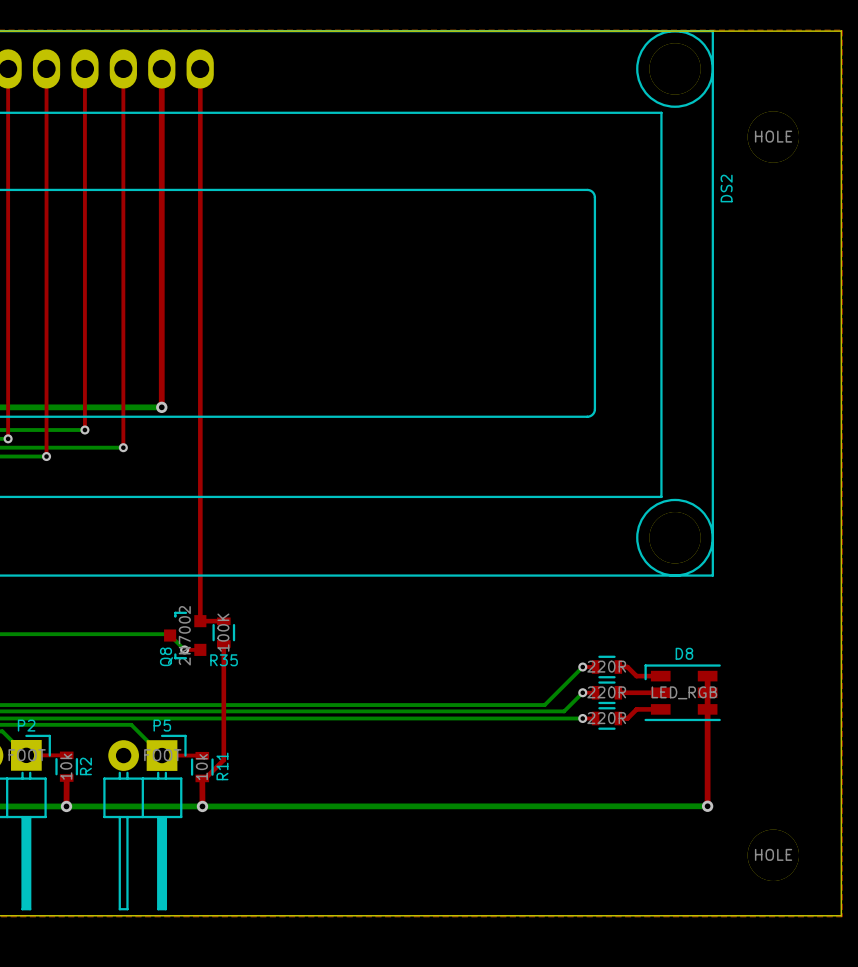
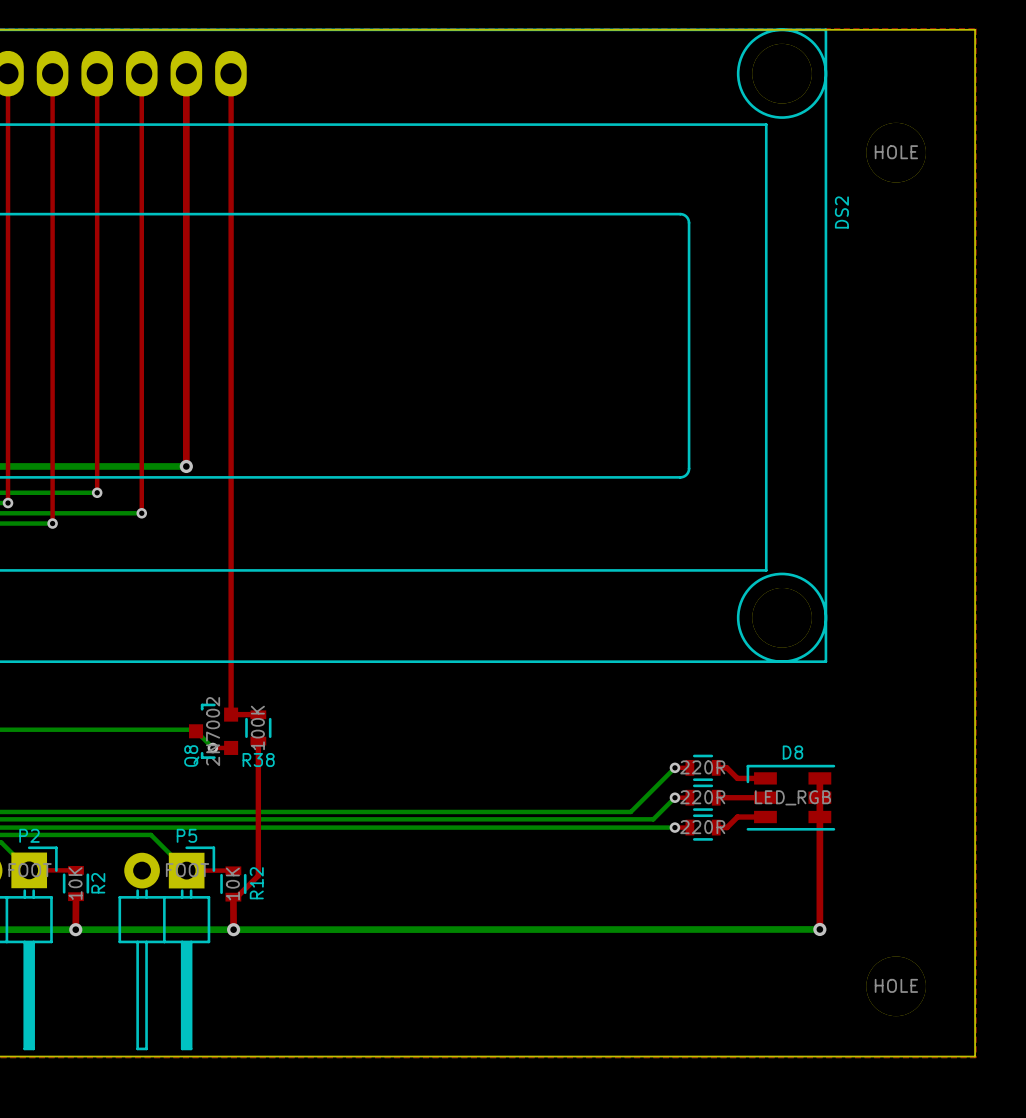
R35 name: R35 (224, 660) -> R38 (258, 760)
R2 value: 10k (66, 766) -> 10K (75, 883)
R11 name: R11 (222, 766) -> R12 (256, 883)
R11 value: 10k (201, 767) -> 10K (232, 883)

